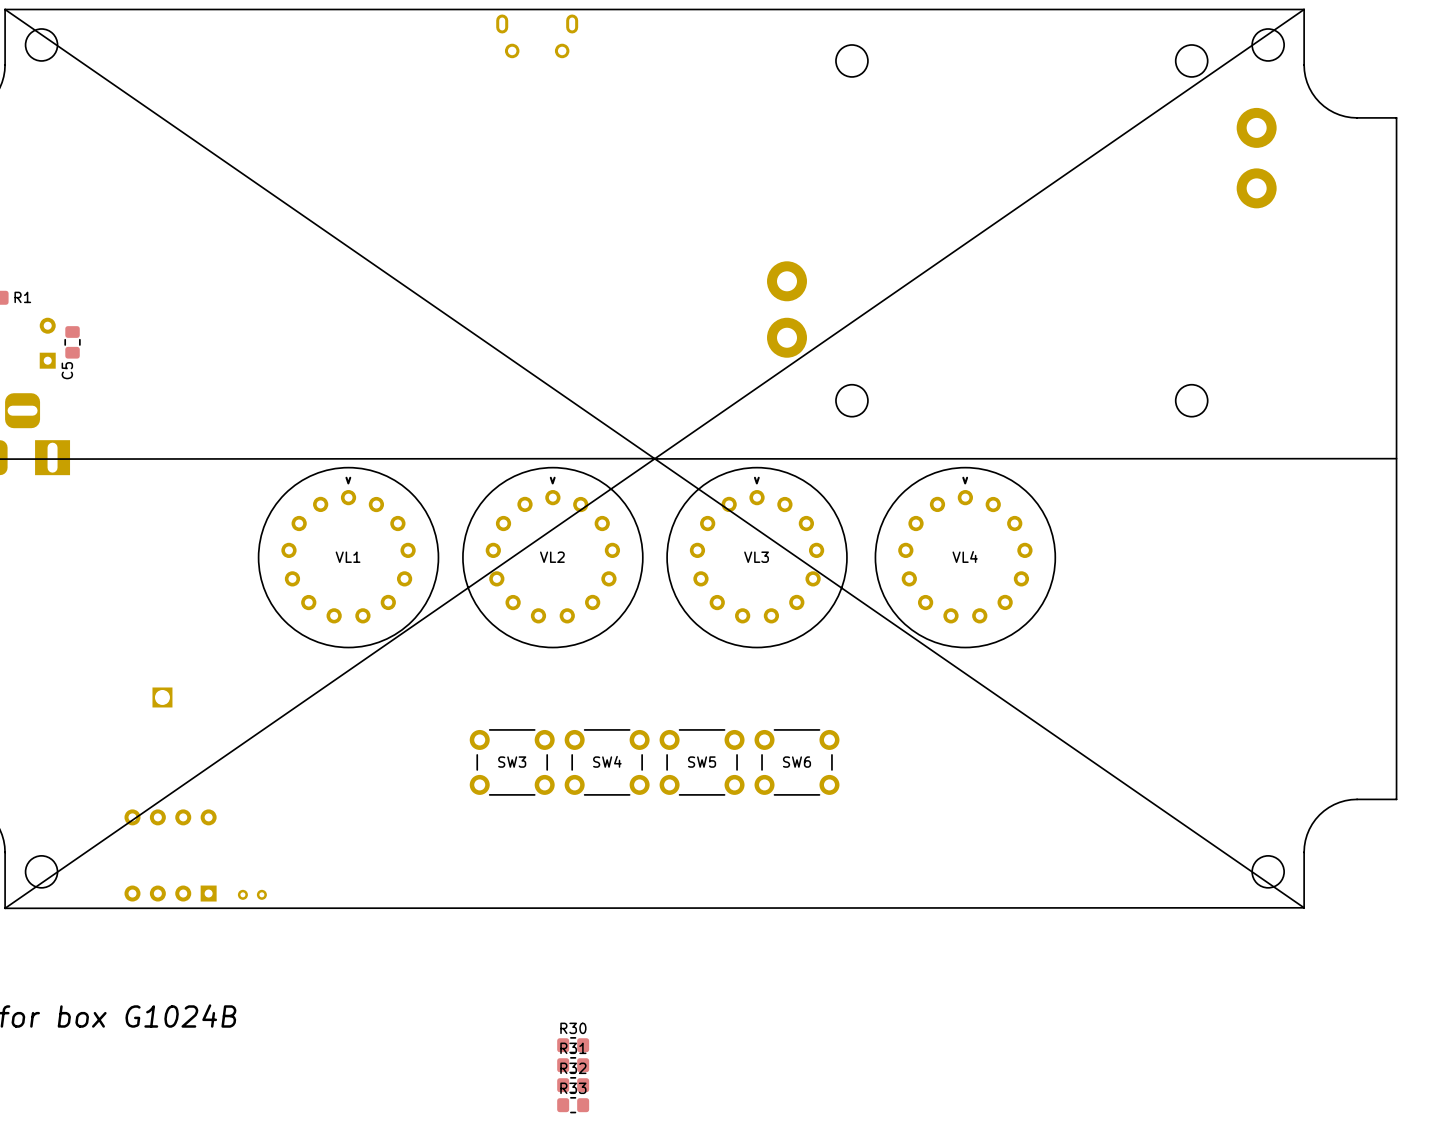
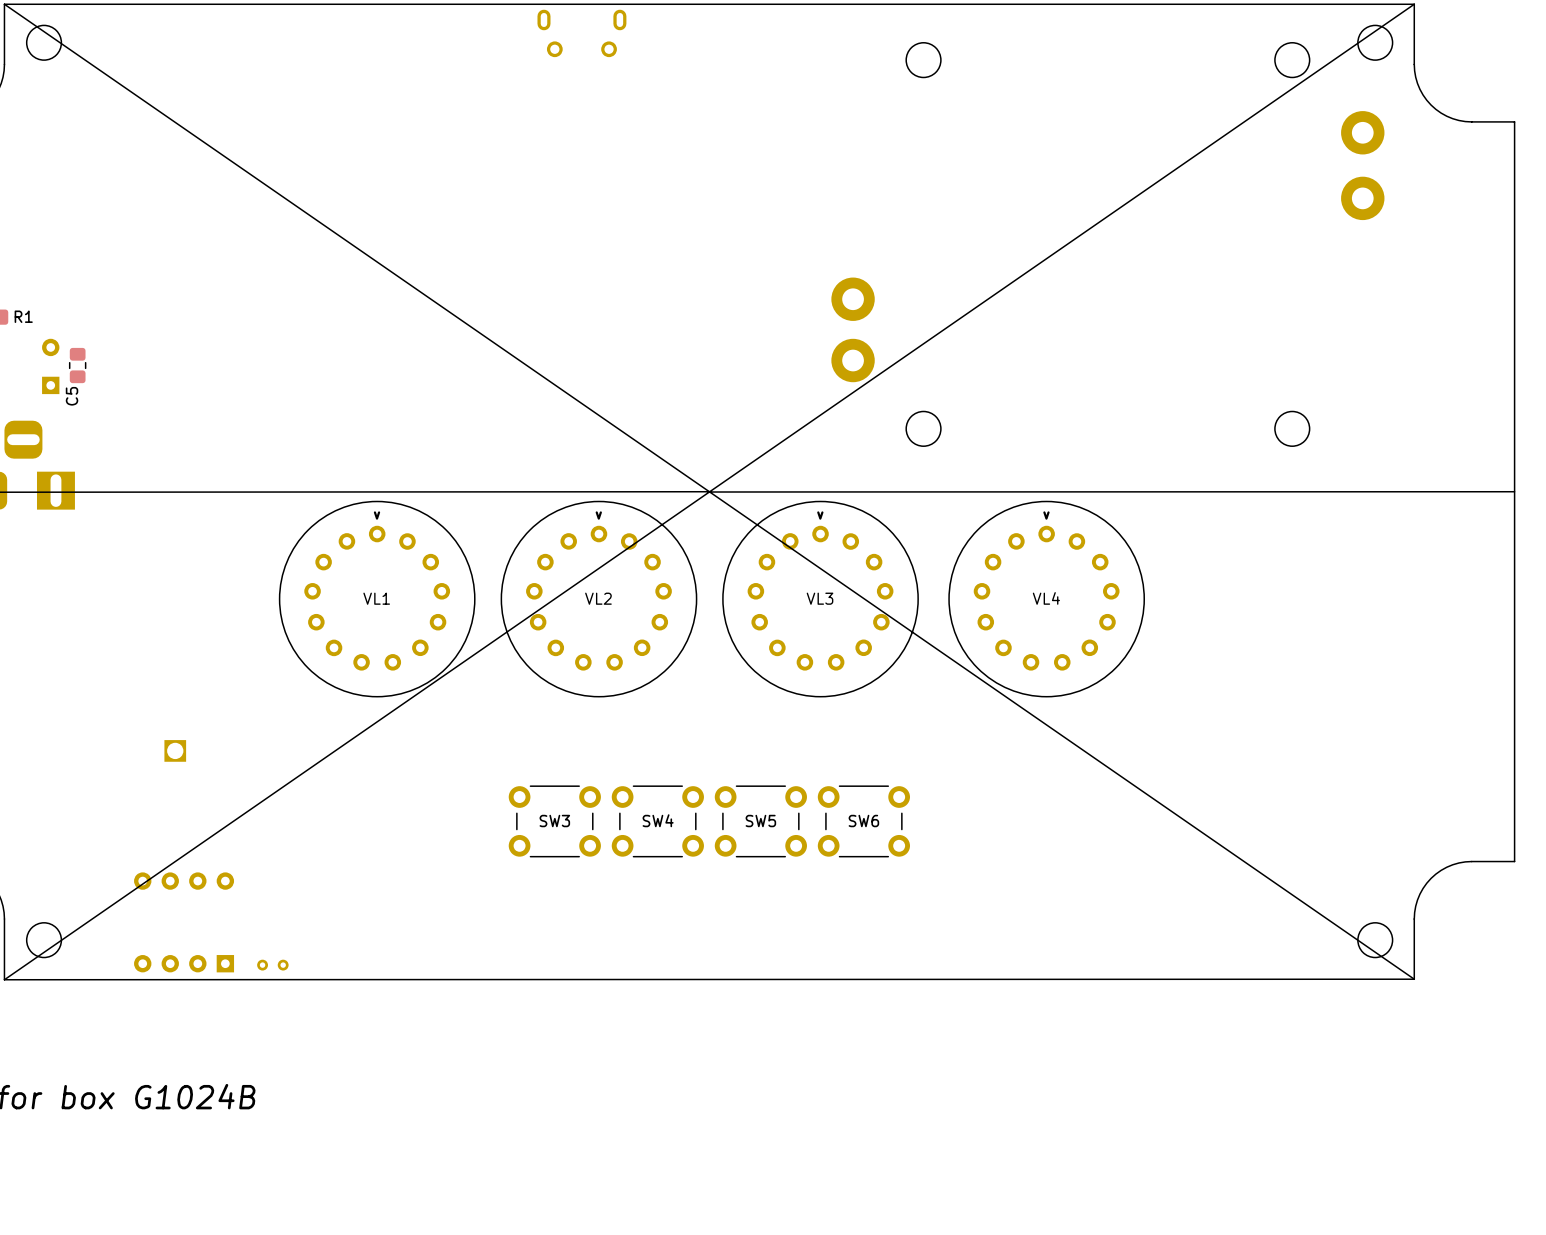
R30: (573, 1045) -> none
R31: (573, 1065) -> none
R32: (573, 1085) -> none
R33: (573, 1105) -> none

